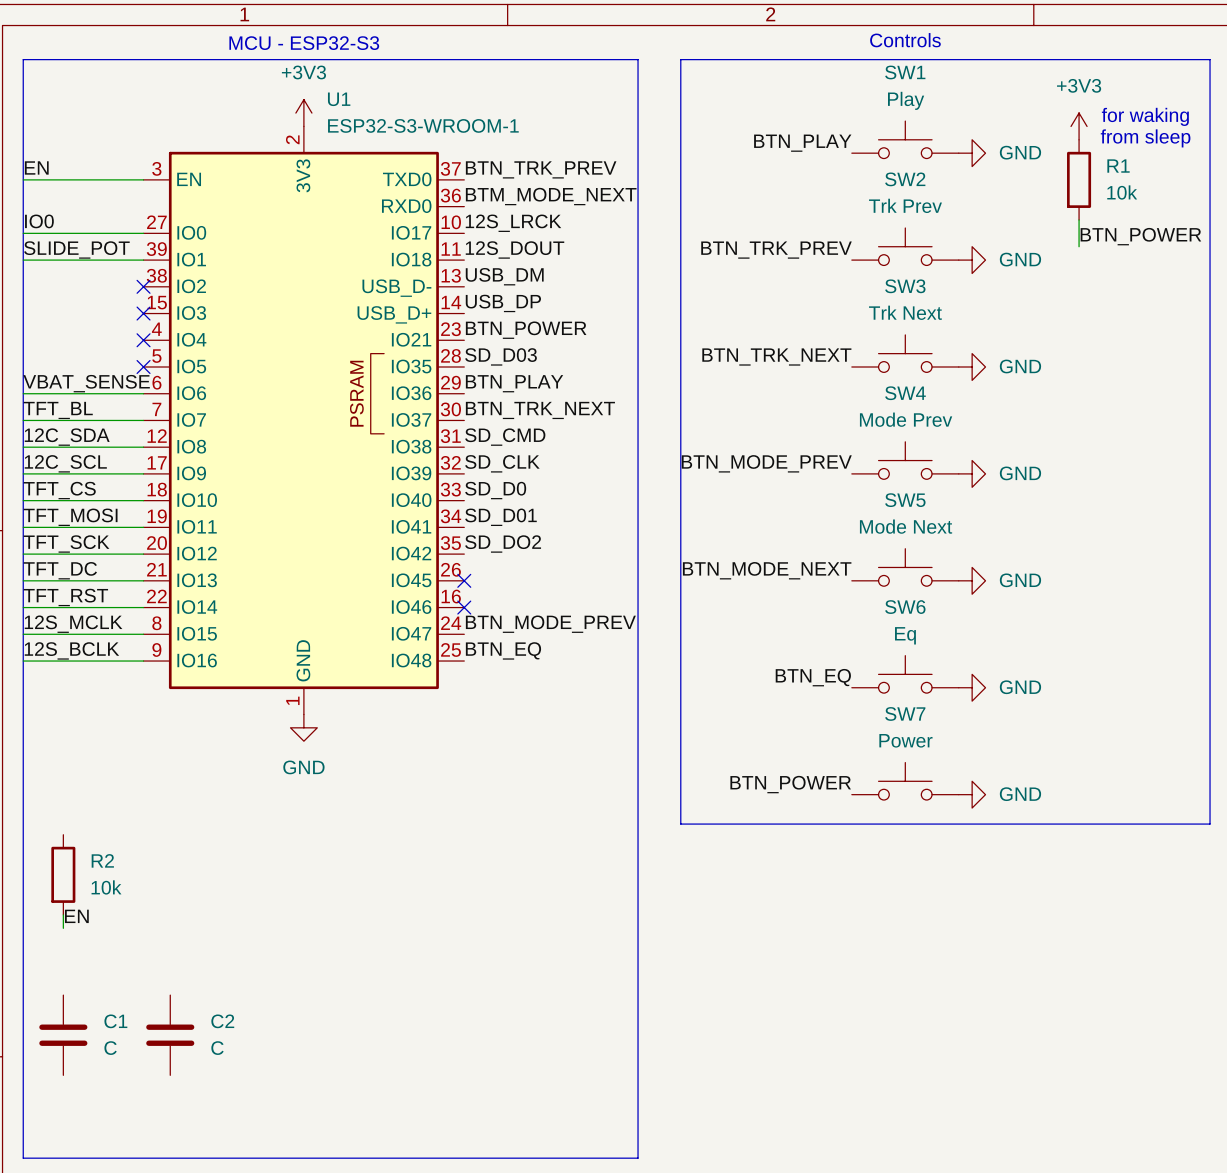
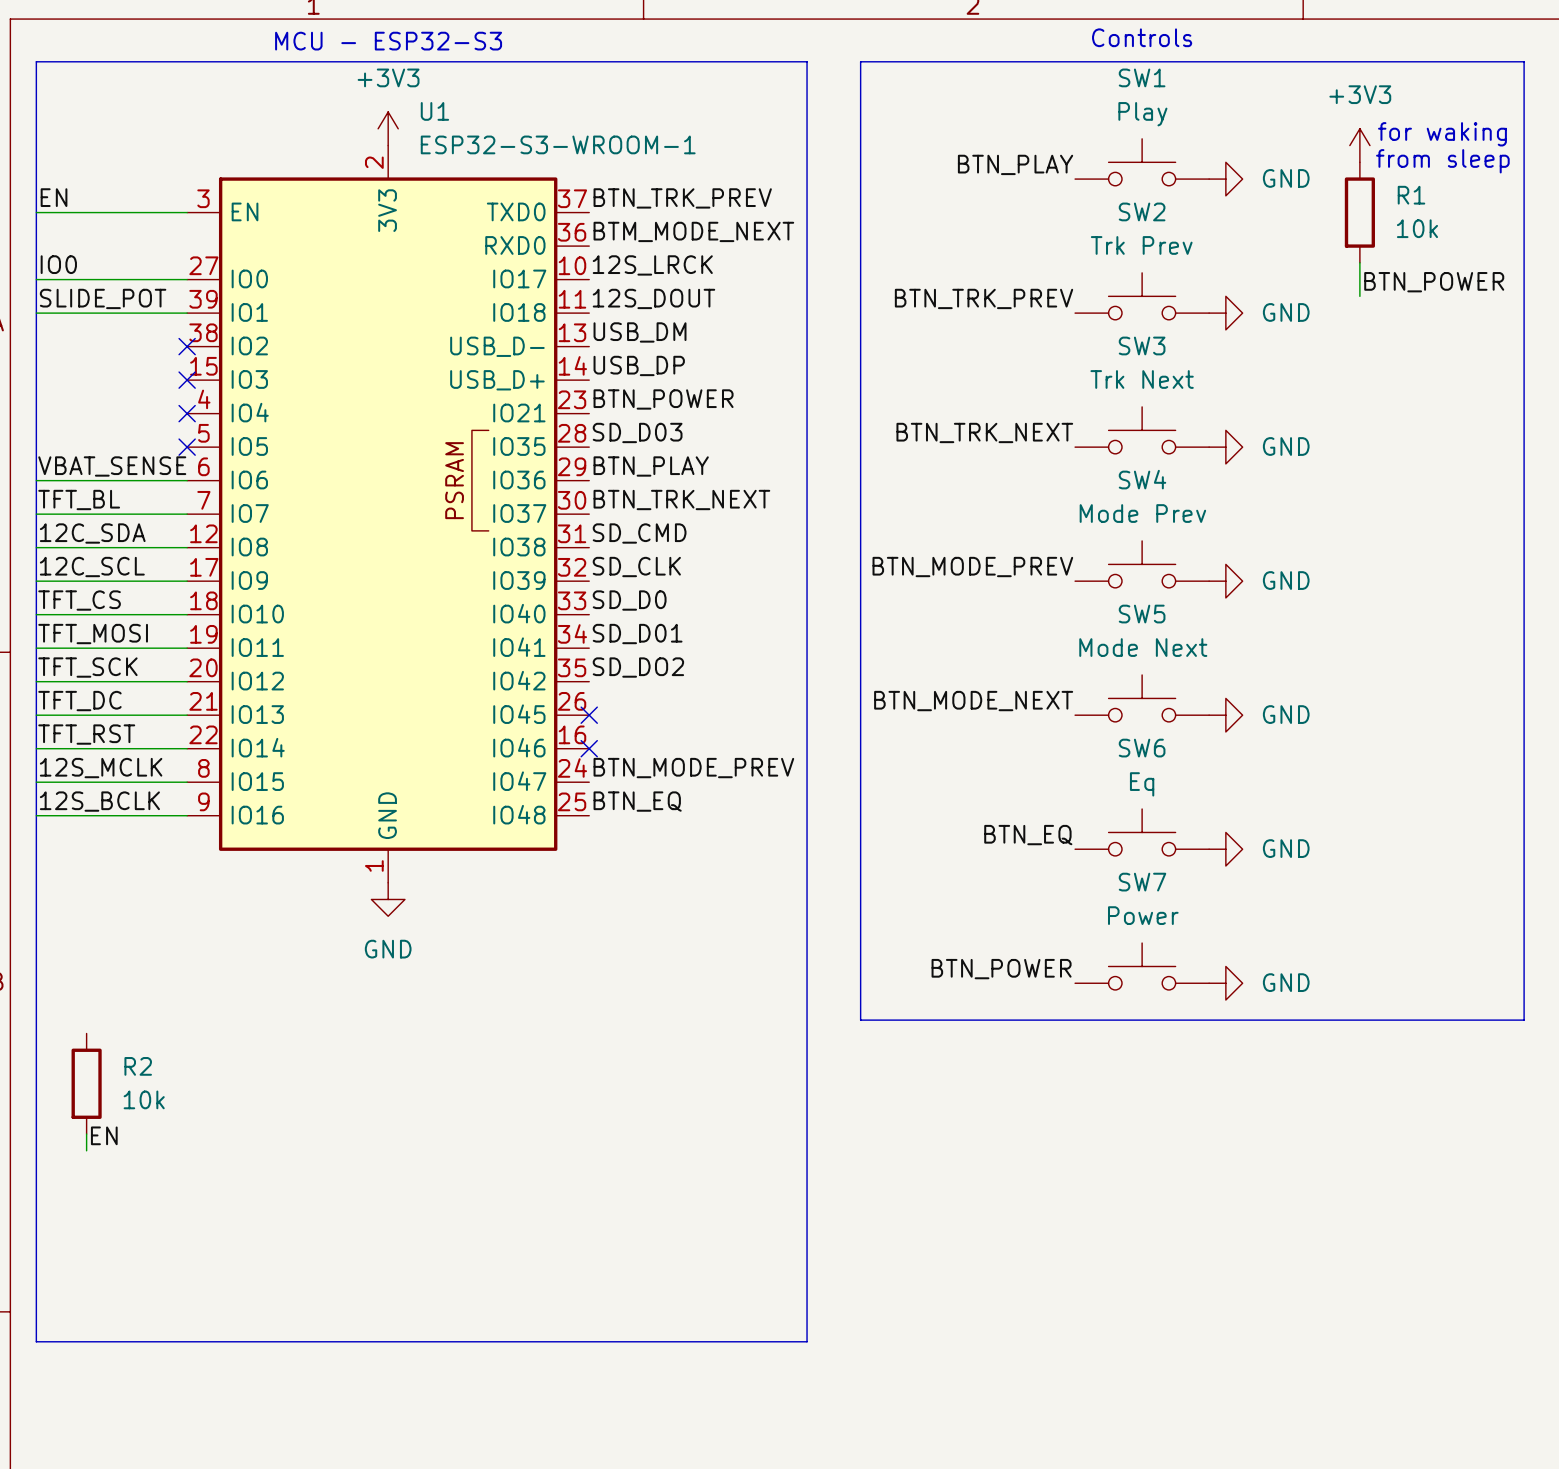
C1: C (63, 1035) -> none
C2: C (170, 1035) -> none
line: (23, 1080) (23, 1158) (638, 1158) (638, 1080) -> (36, 1341) (807, 1341)

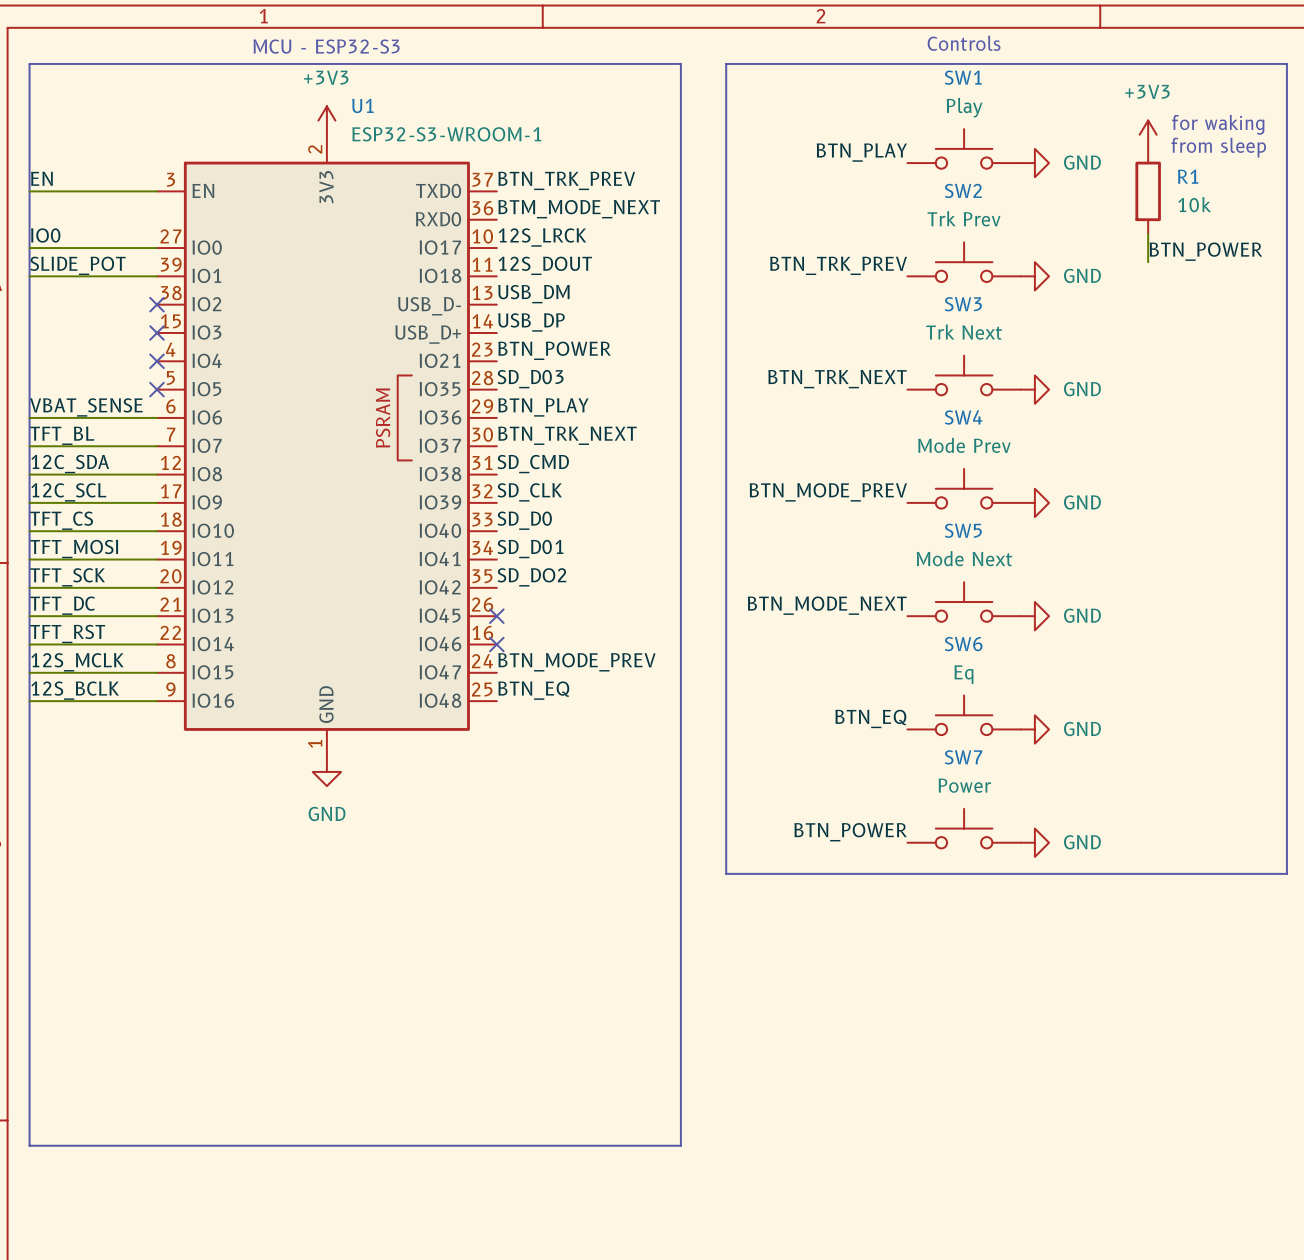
R2: 10k (86, 1083) -> none
wire: (86, 1134) (86, 1150) -> none
label: EN (104, 1135) -> none

